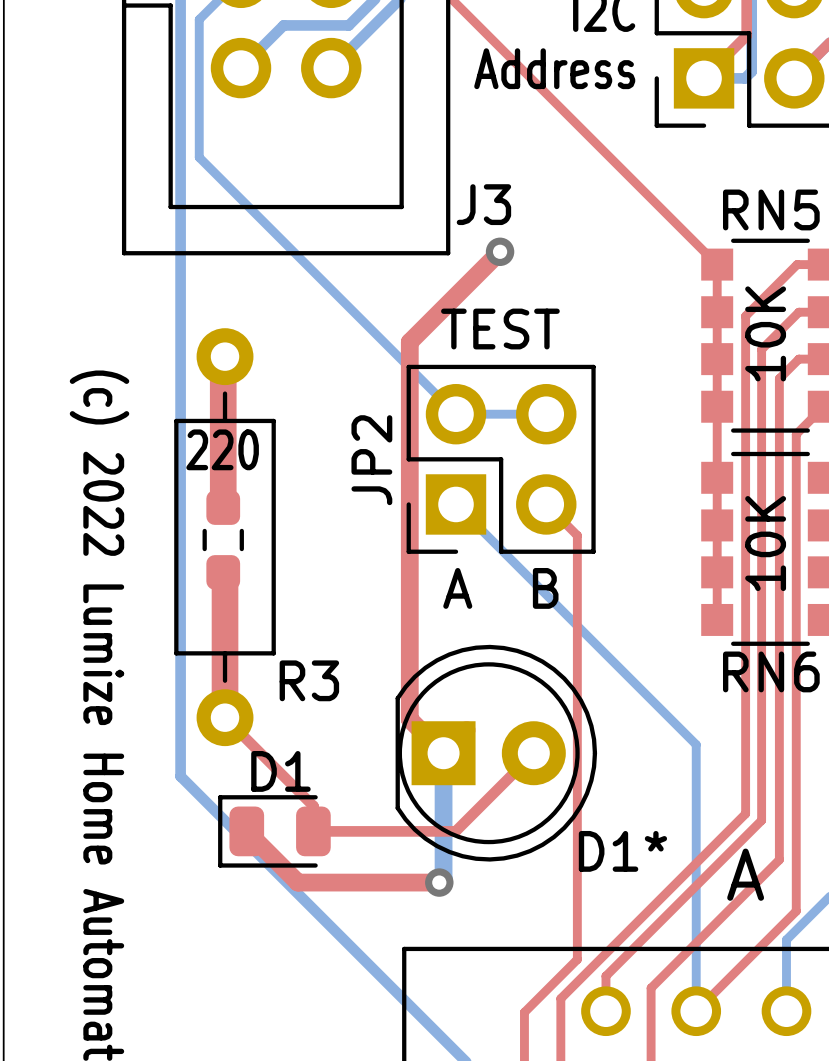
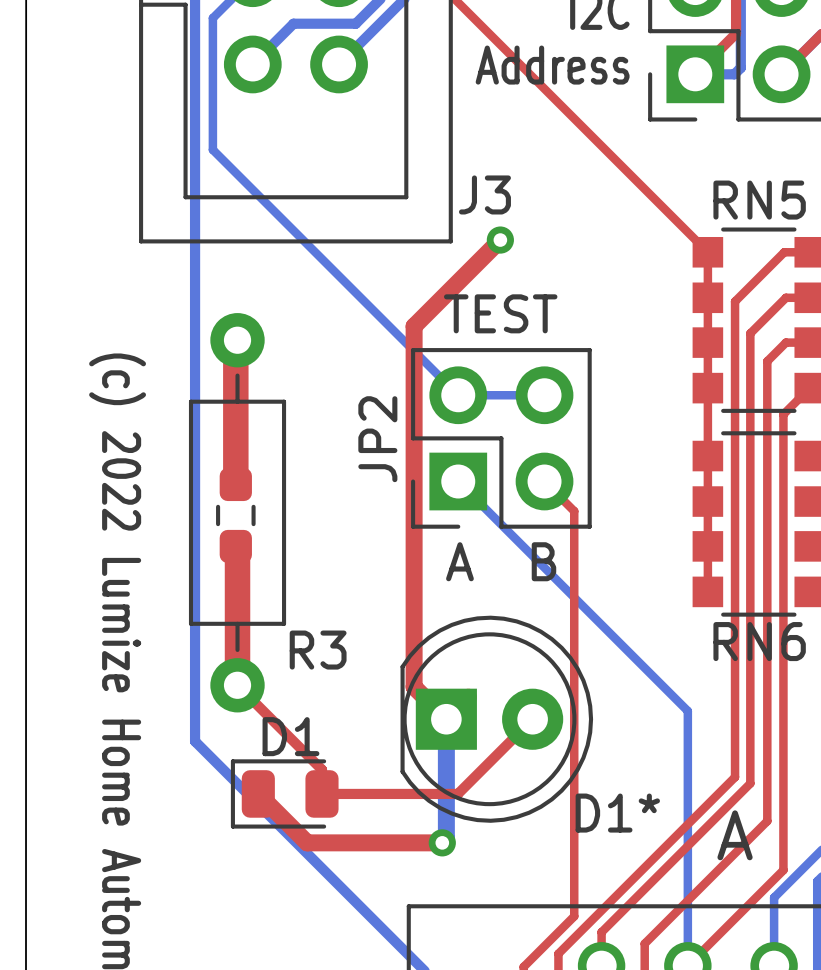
text: 10K (765, 333) -> none
text: 220 (222, 449) -> none
text: 10K (765, 543) -> none

